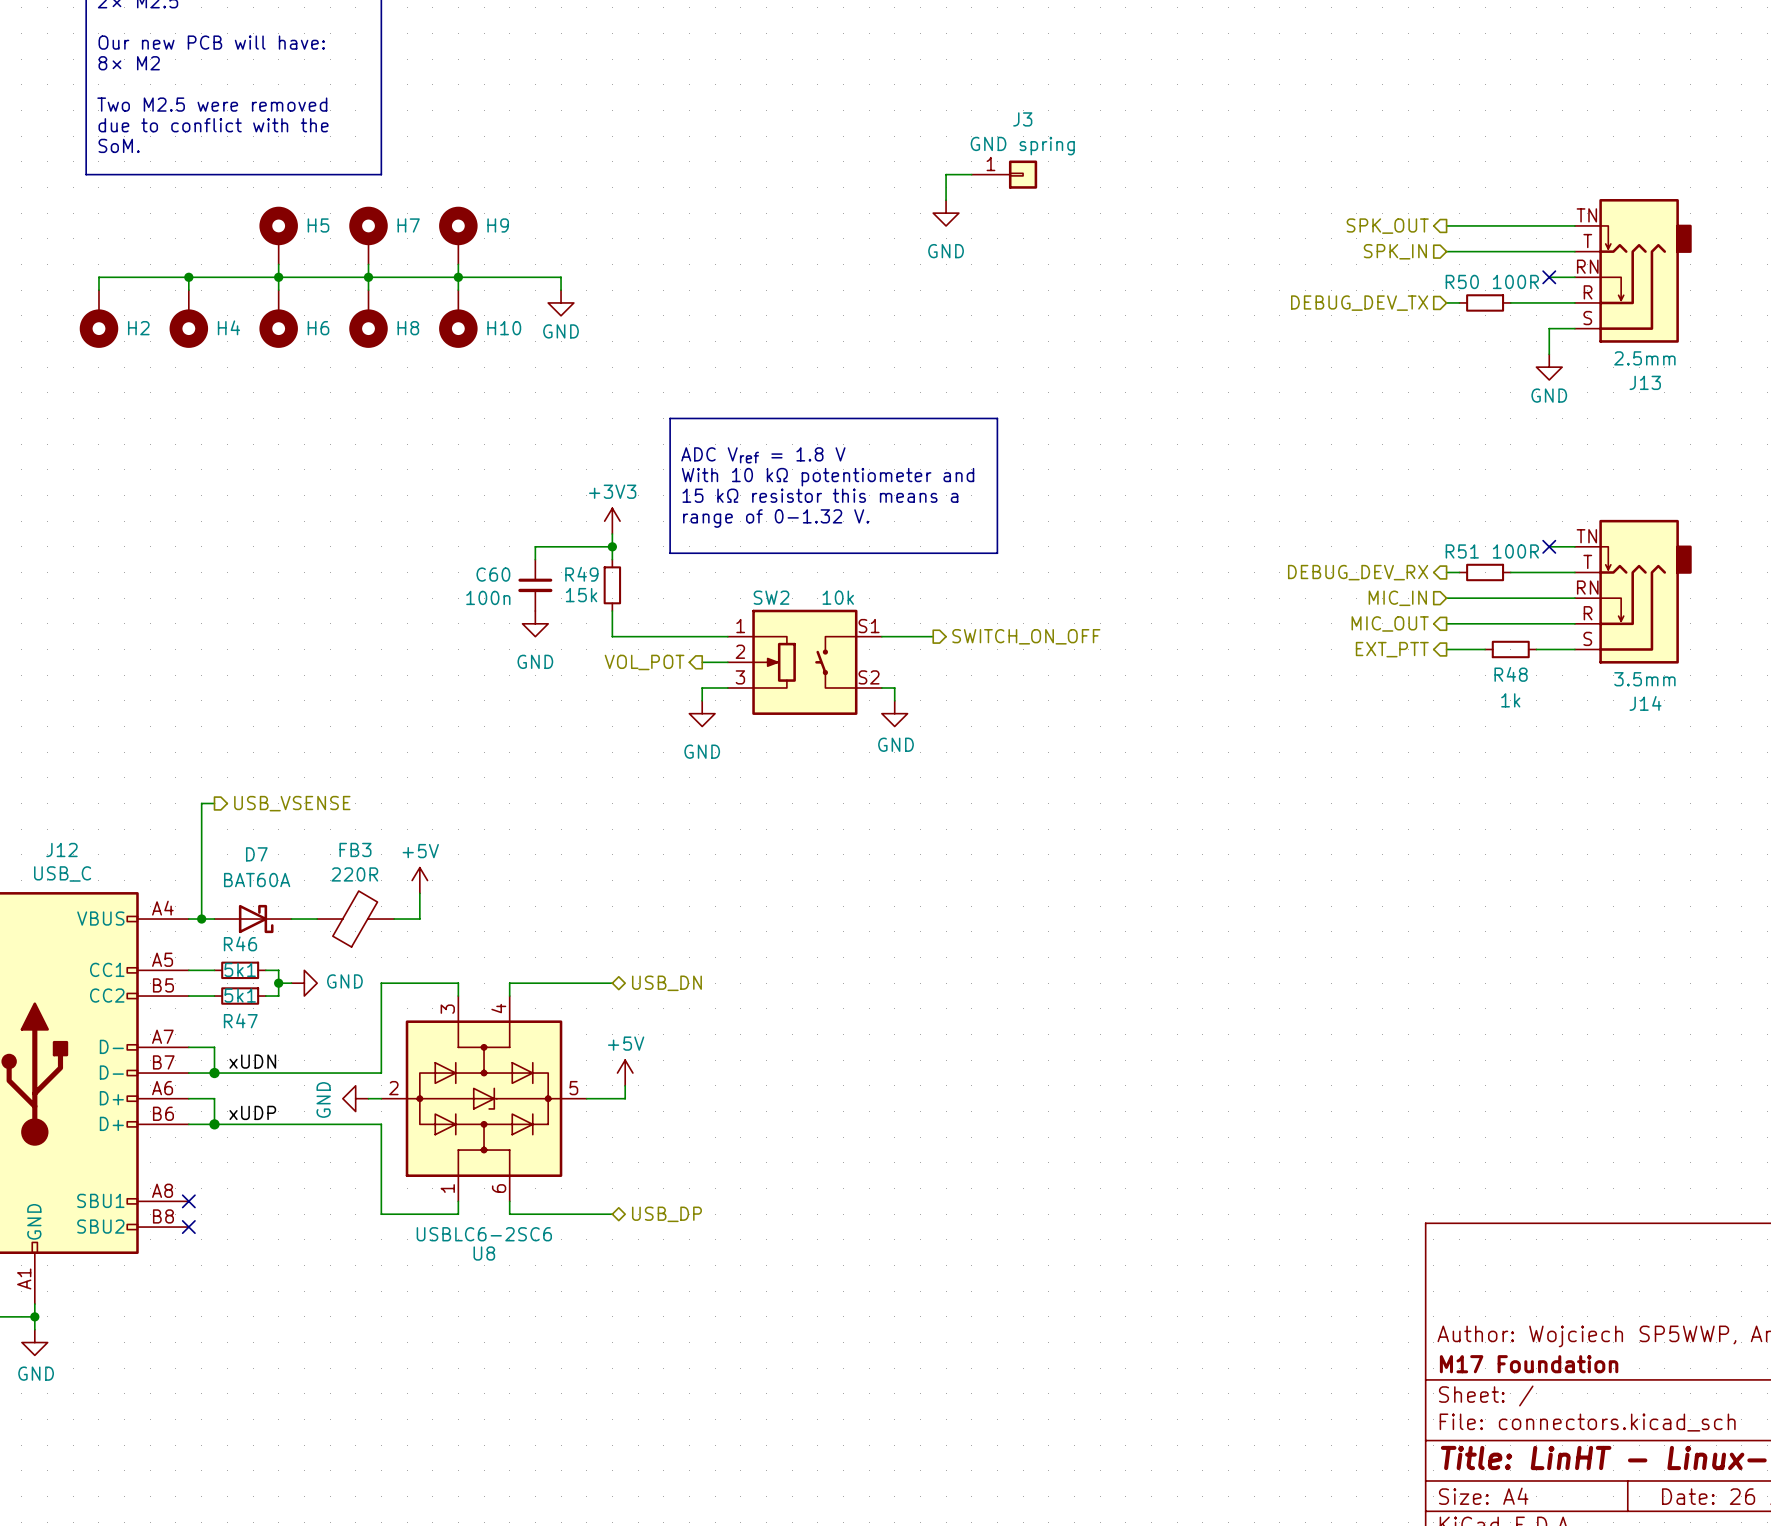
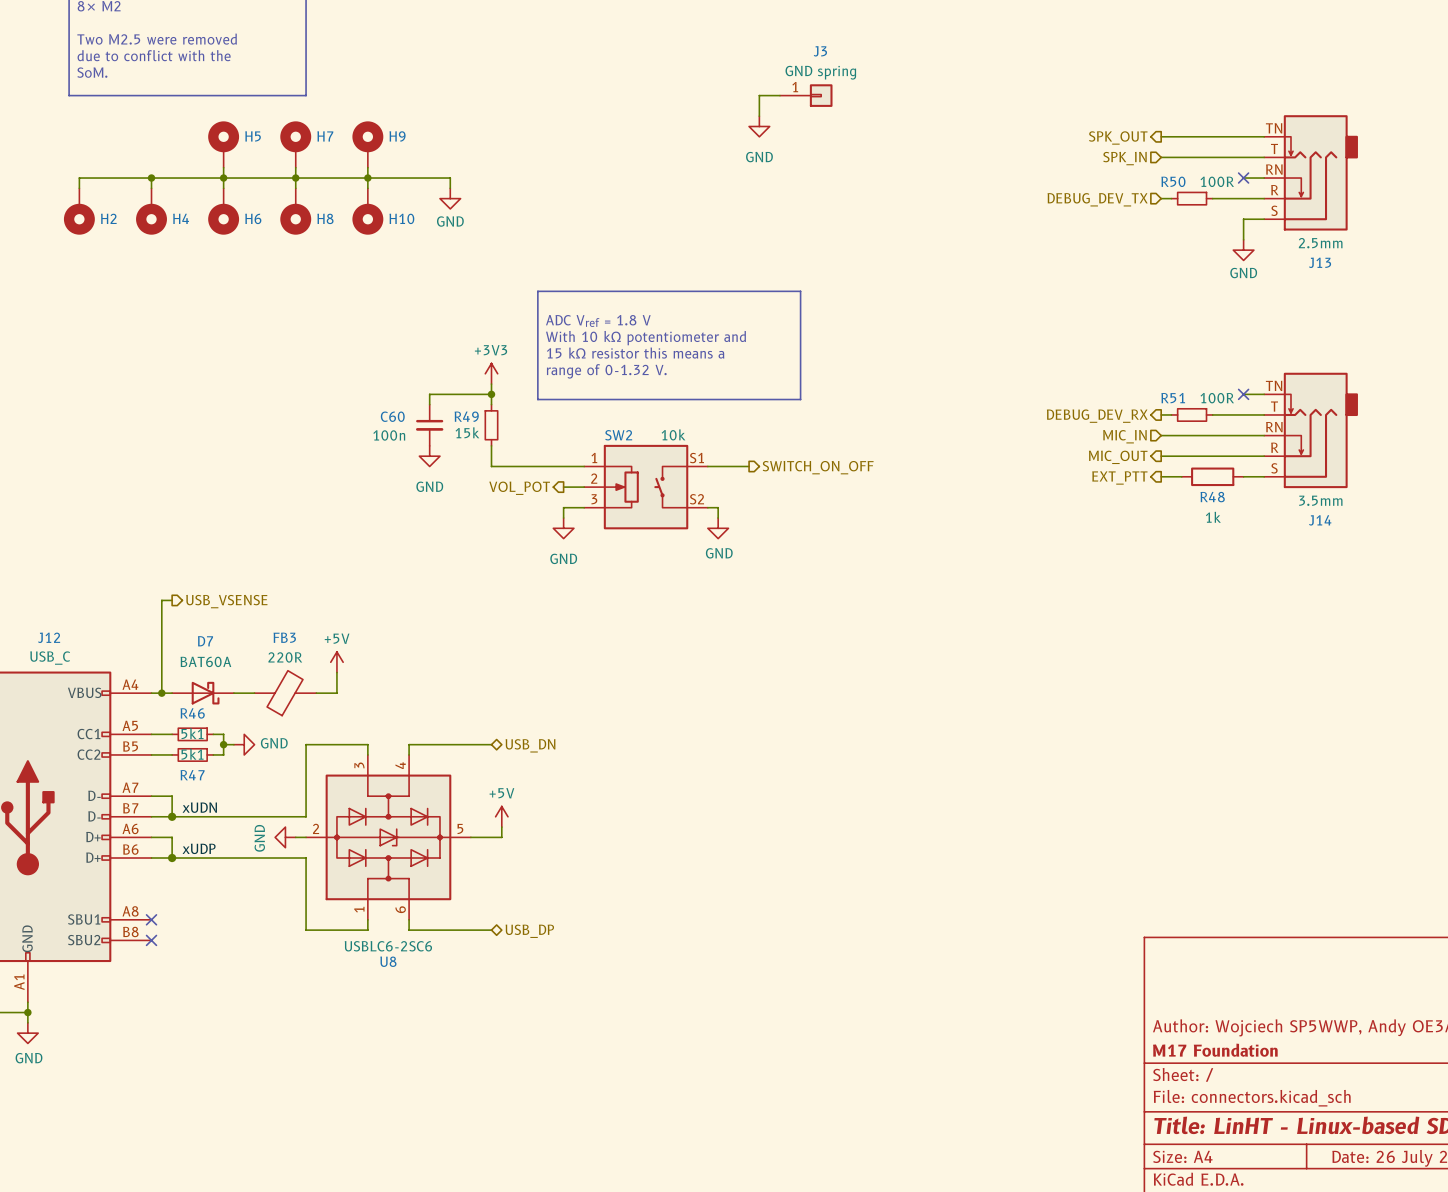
R48 symbol: [1485, 640, 1537, 659] -> [1181, 467, 1244, 487]

